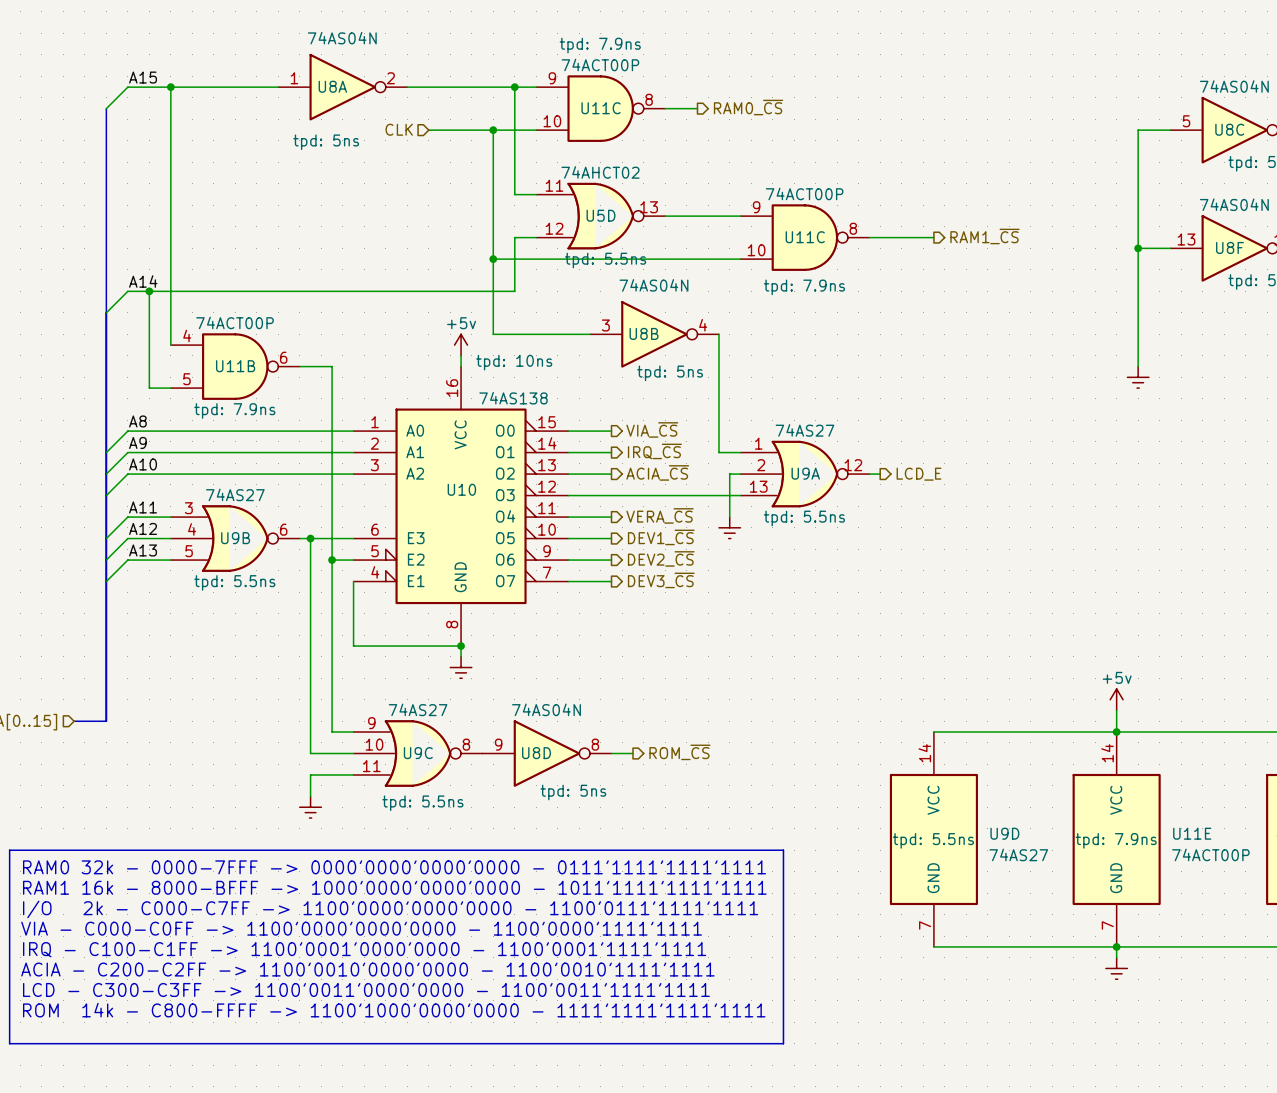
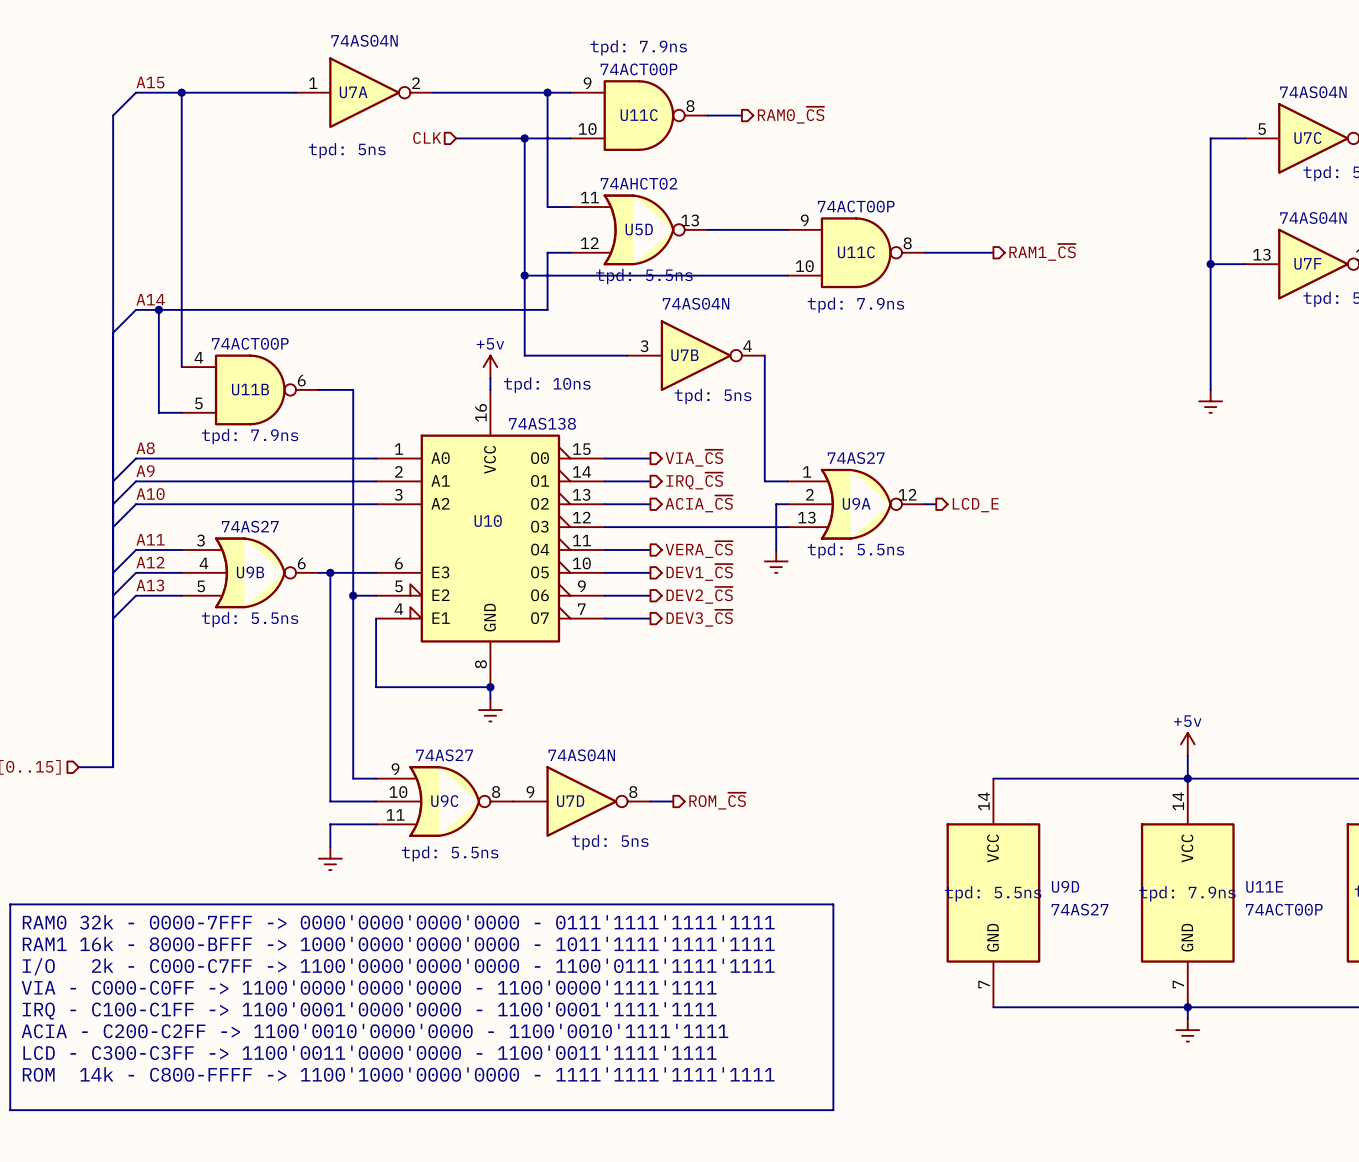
U8A name: U8A (332, 86) -> U7A (353, 92)
U8C name: U8C (1229, 129) -> U7C (1307, 138)
U8F name: U8F (1230, 247) -> U7F (1307, 263)
U8B name: U8B (644, 333) -> U7B (684, 355)
U8D name: U8D (536, 753) -> U7D (570, 801)

